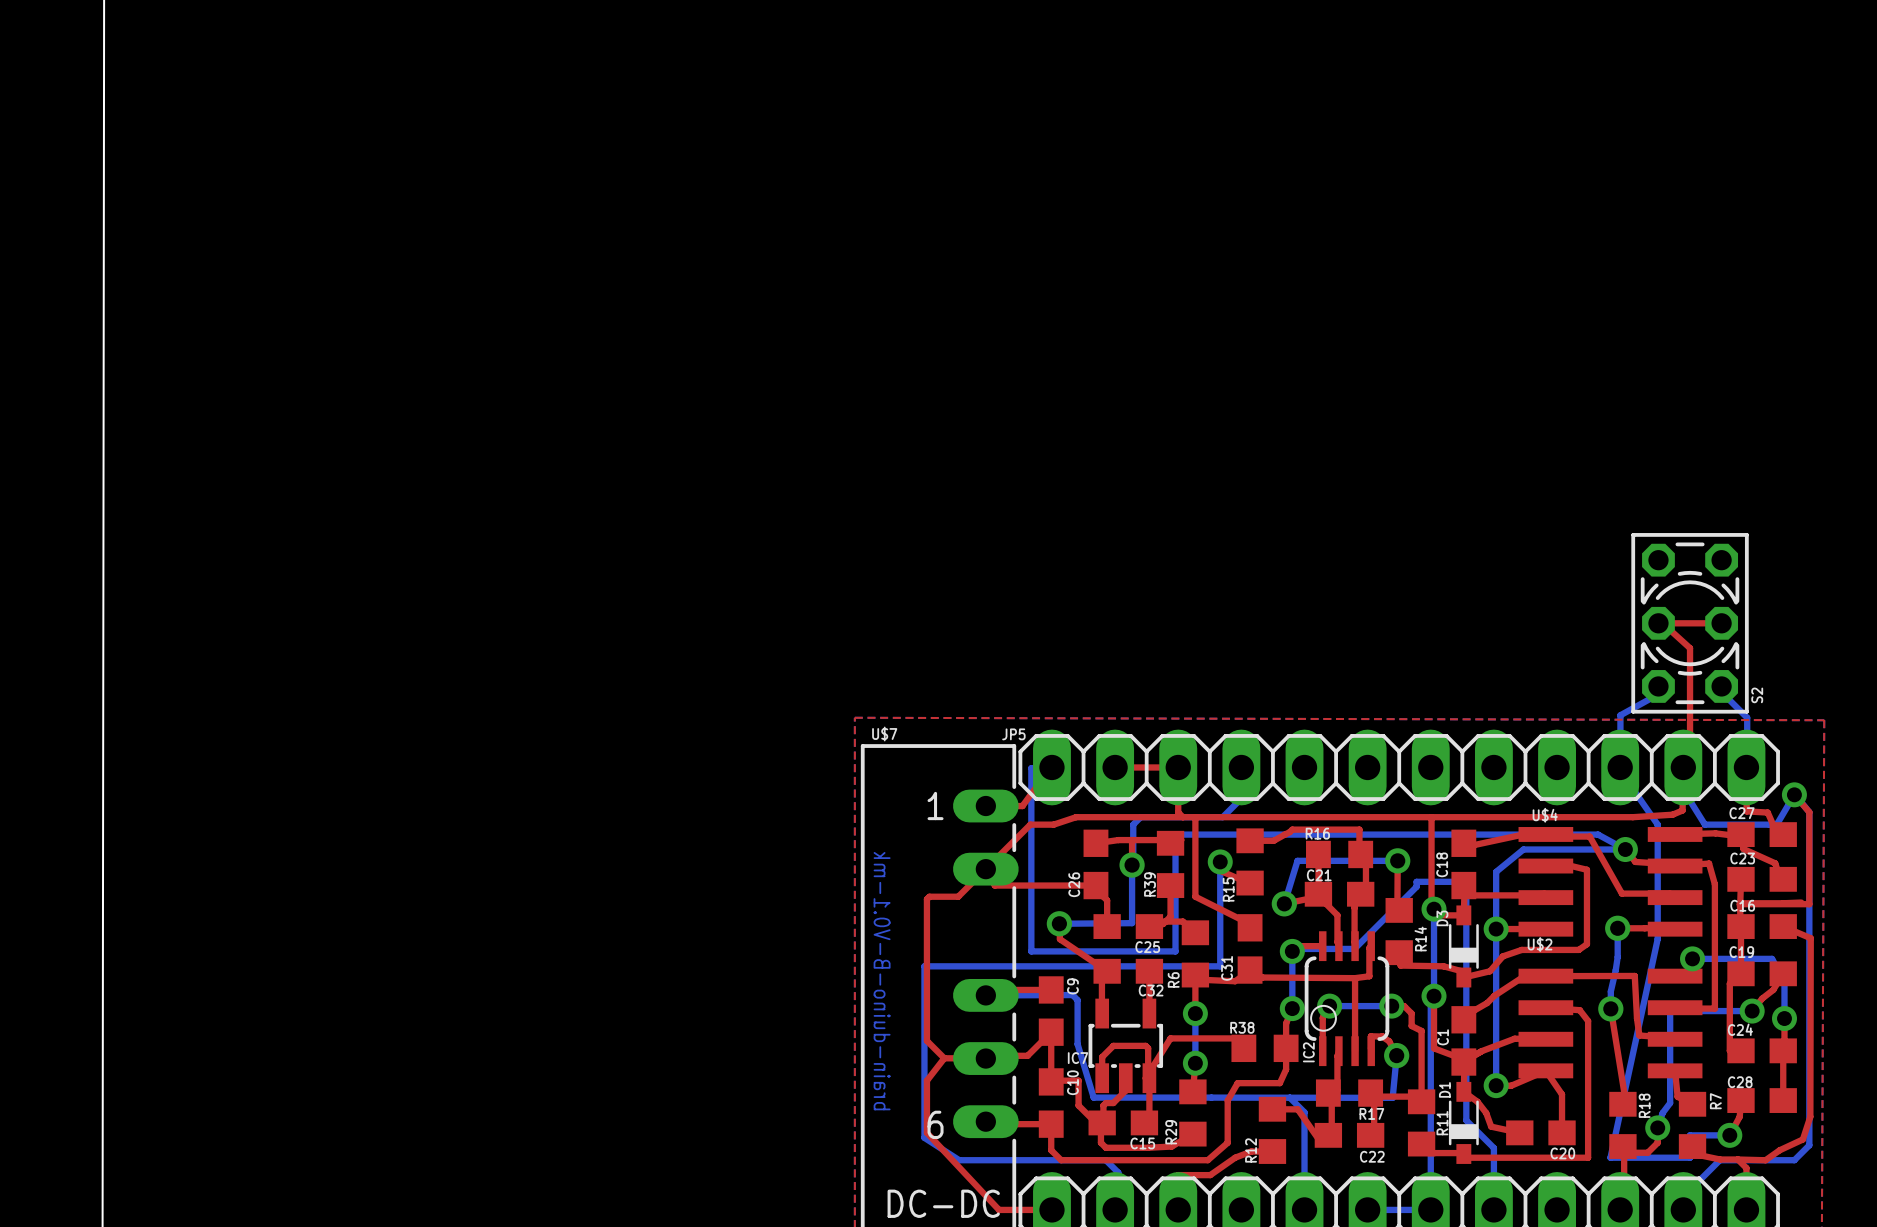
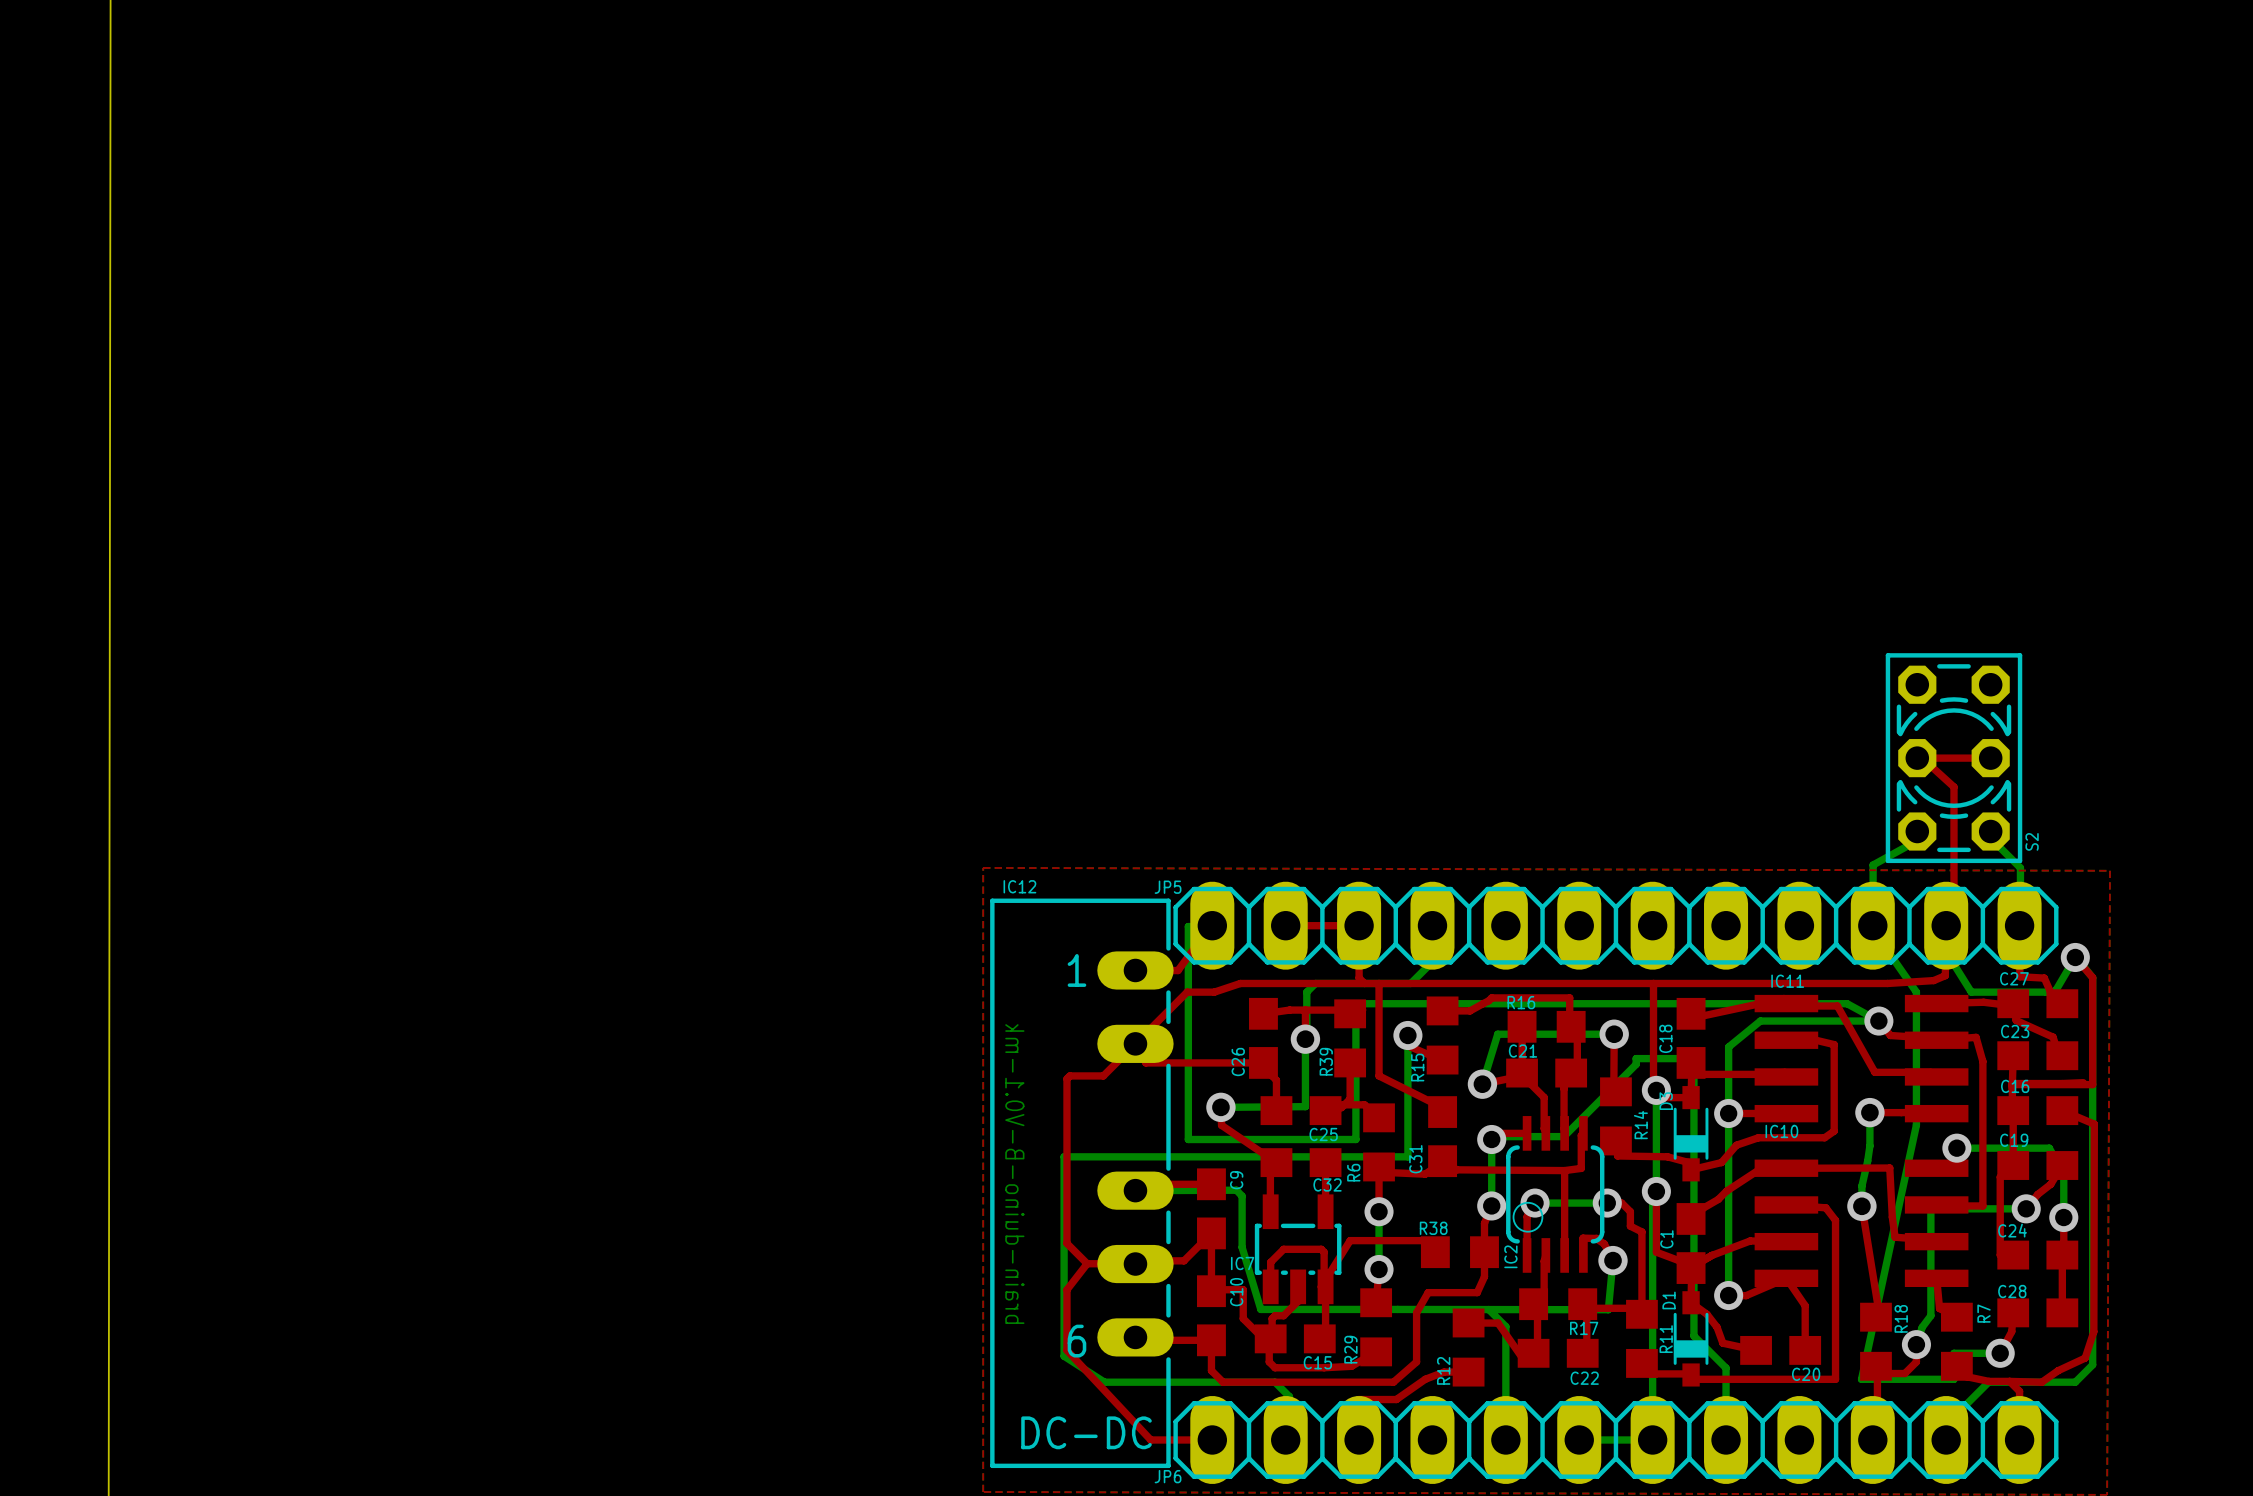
U$7 name: U$7 (884, 733) -> IC12 (1019, 886)
U$4 name: U$4 (1545, 815) -> IC11 (1787, 981)
U$2 name: U$2 (1540, 944) -> IC10 (1781, 1131)

